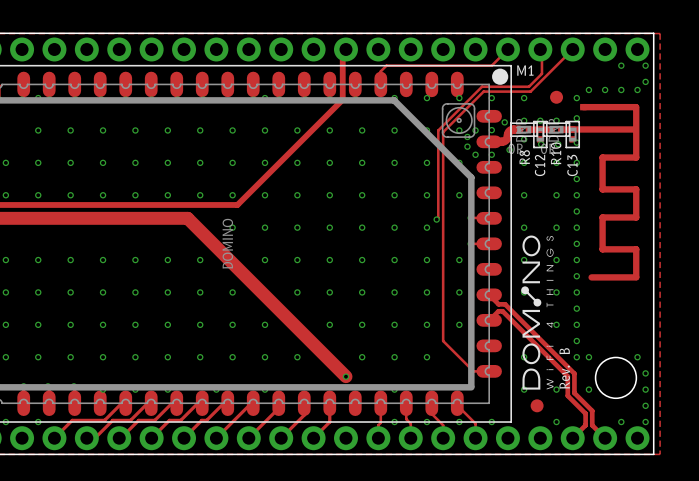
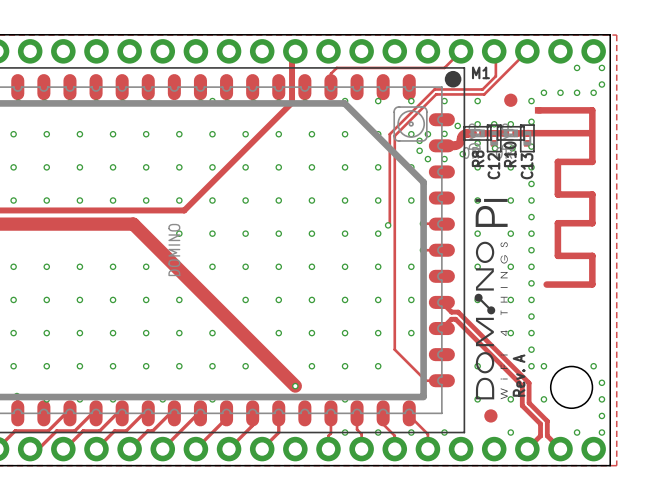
drawing: none -> [474, 198, 508, 400]
text: B (564, 351) -> A (519, 358)

